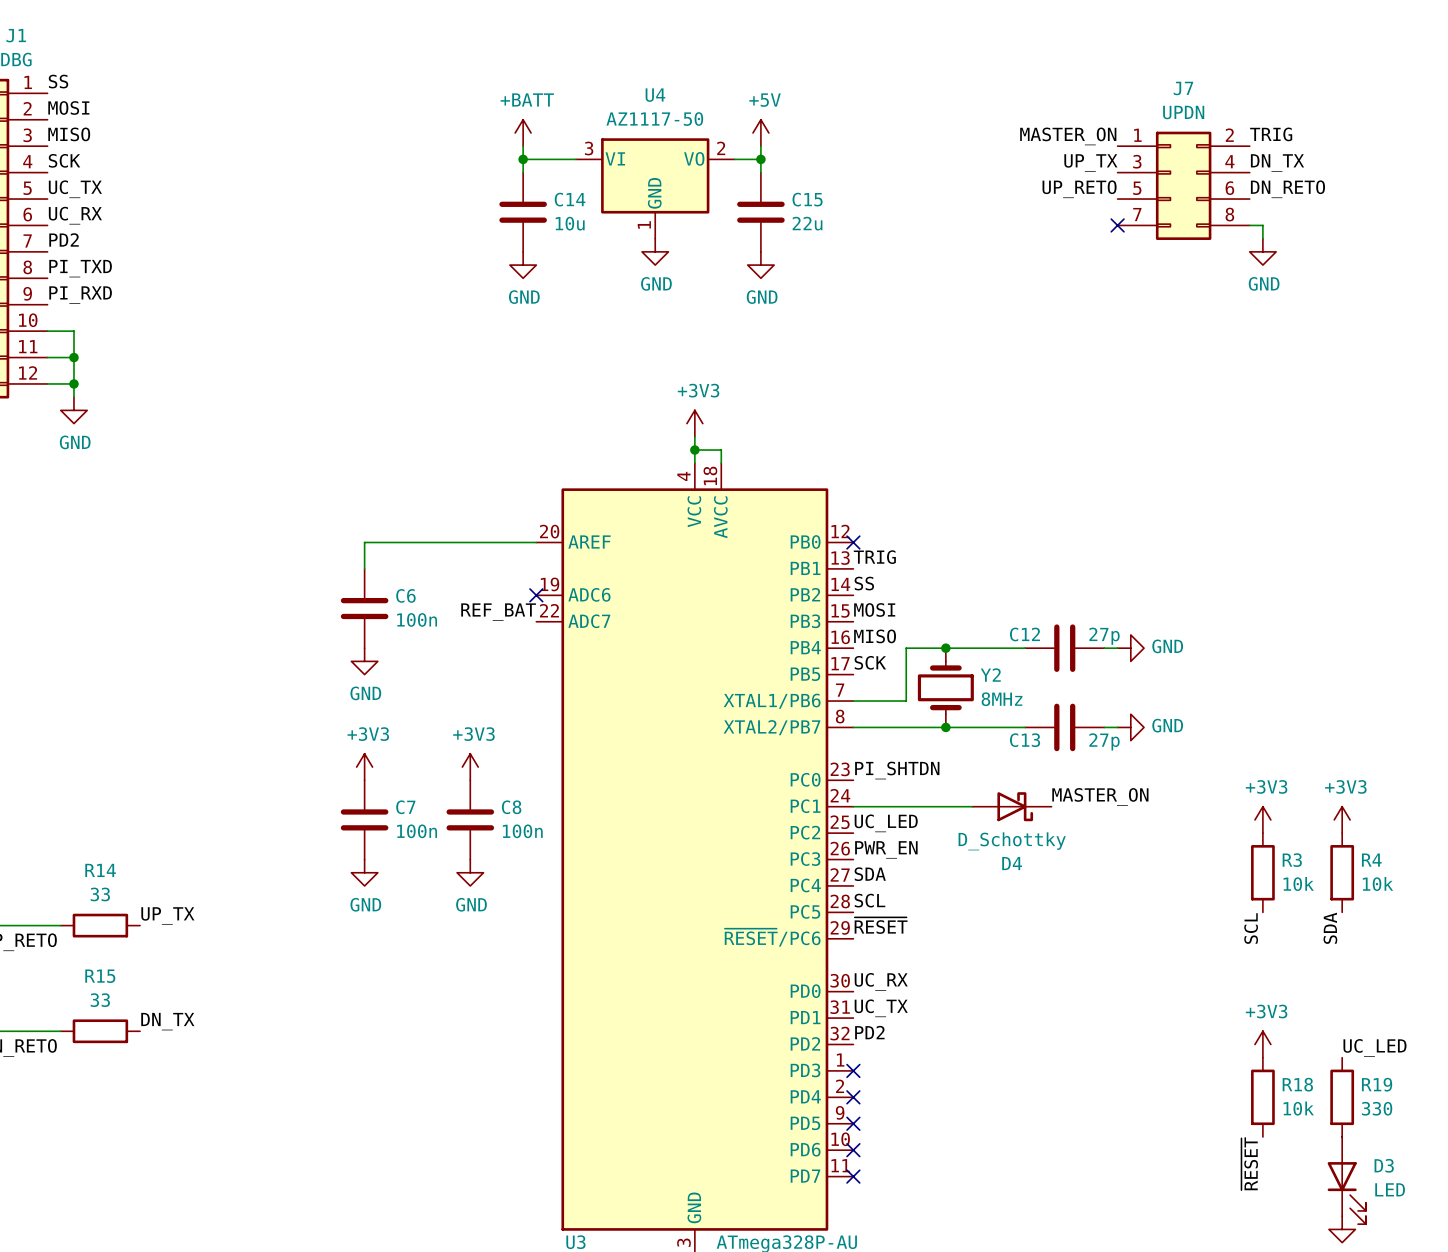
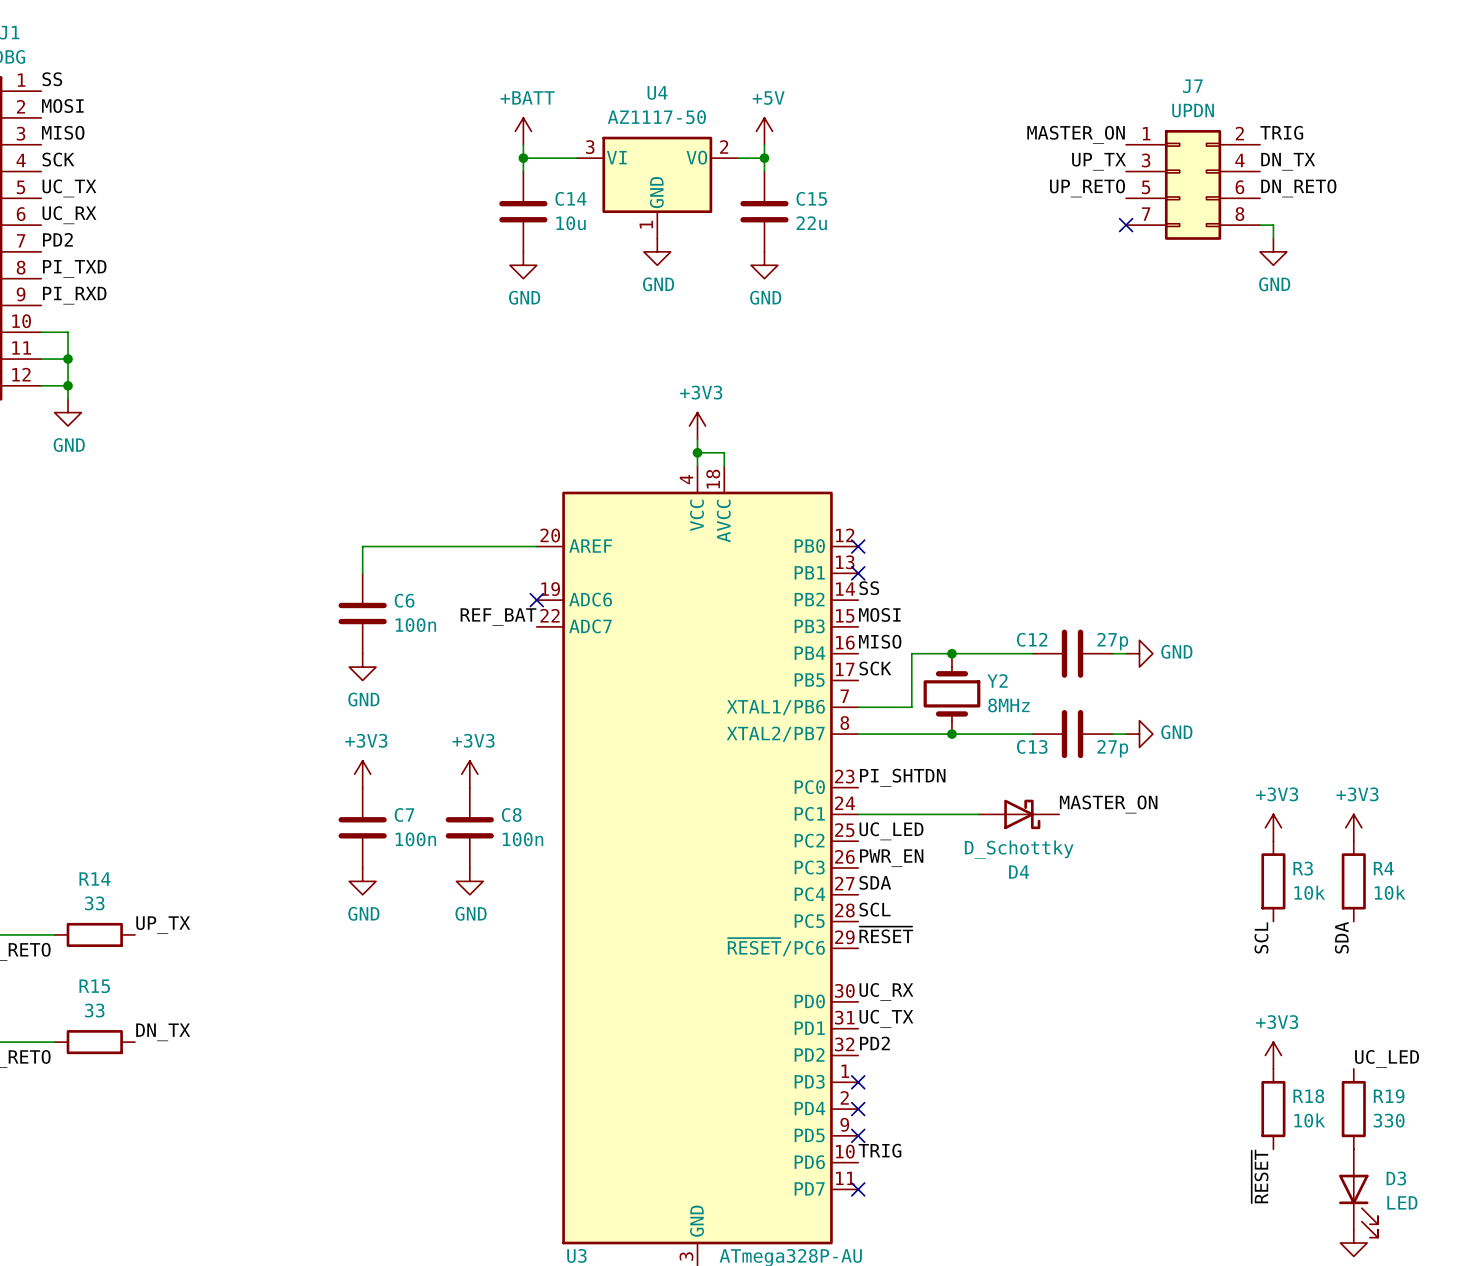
label: TRIG (874, 557) -> none
no-connect mark: none -> (858, 573)
label: none -> TRIG (879, 1150)
no-connect mark: (853, 1150) -> none

